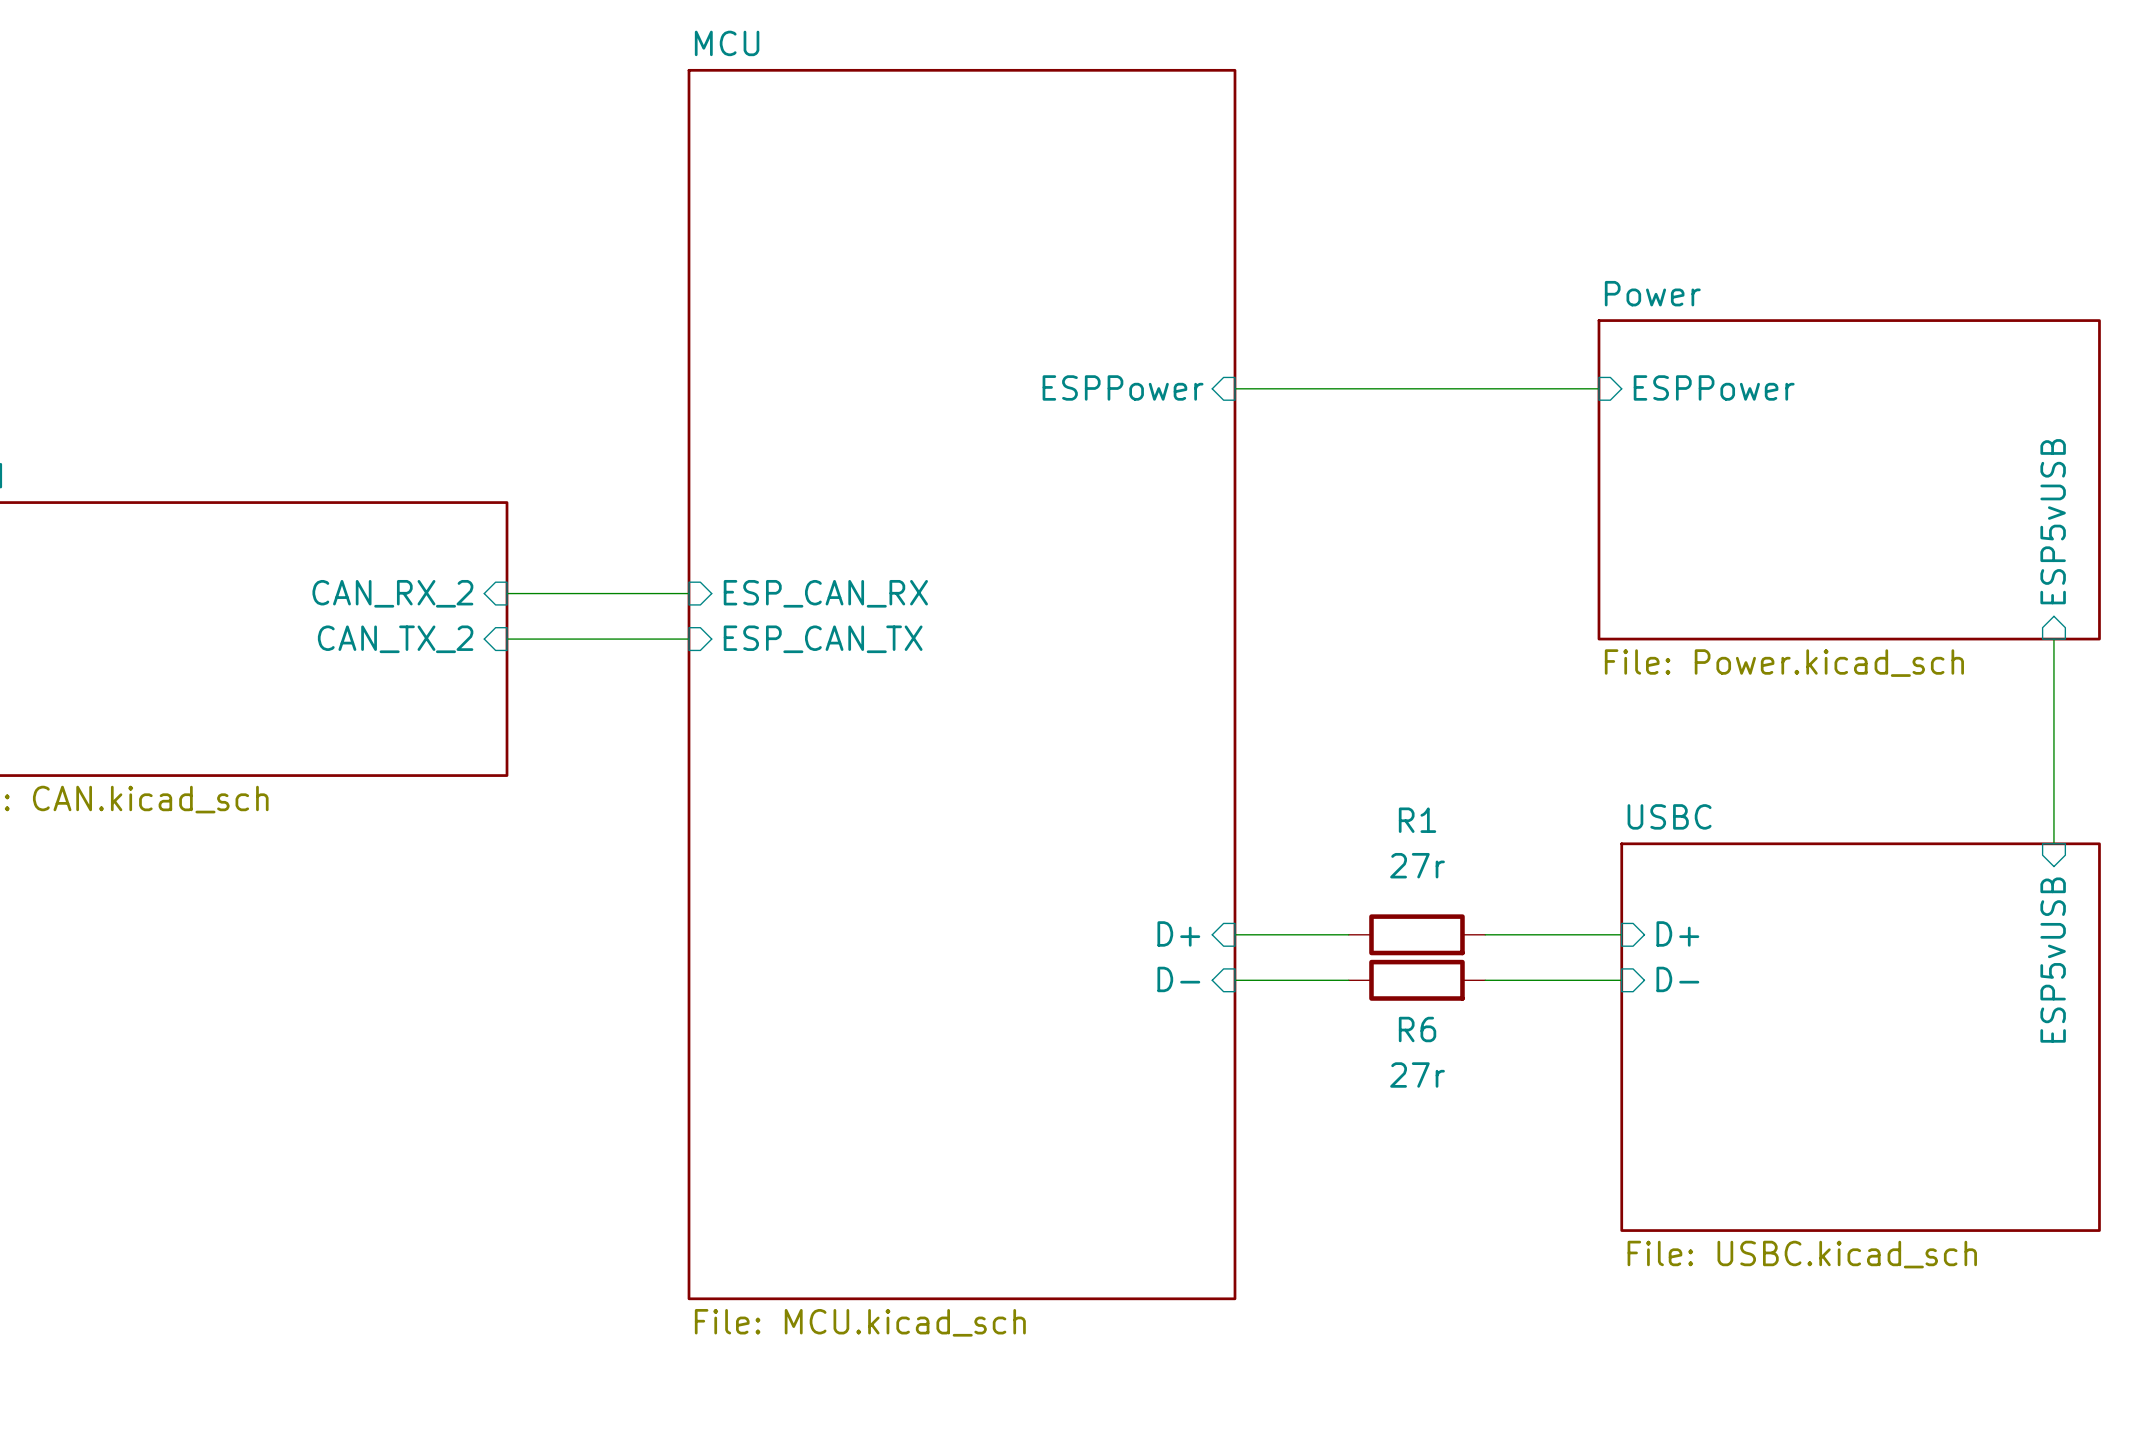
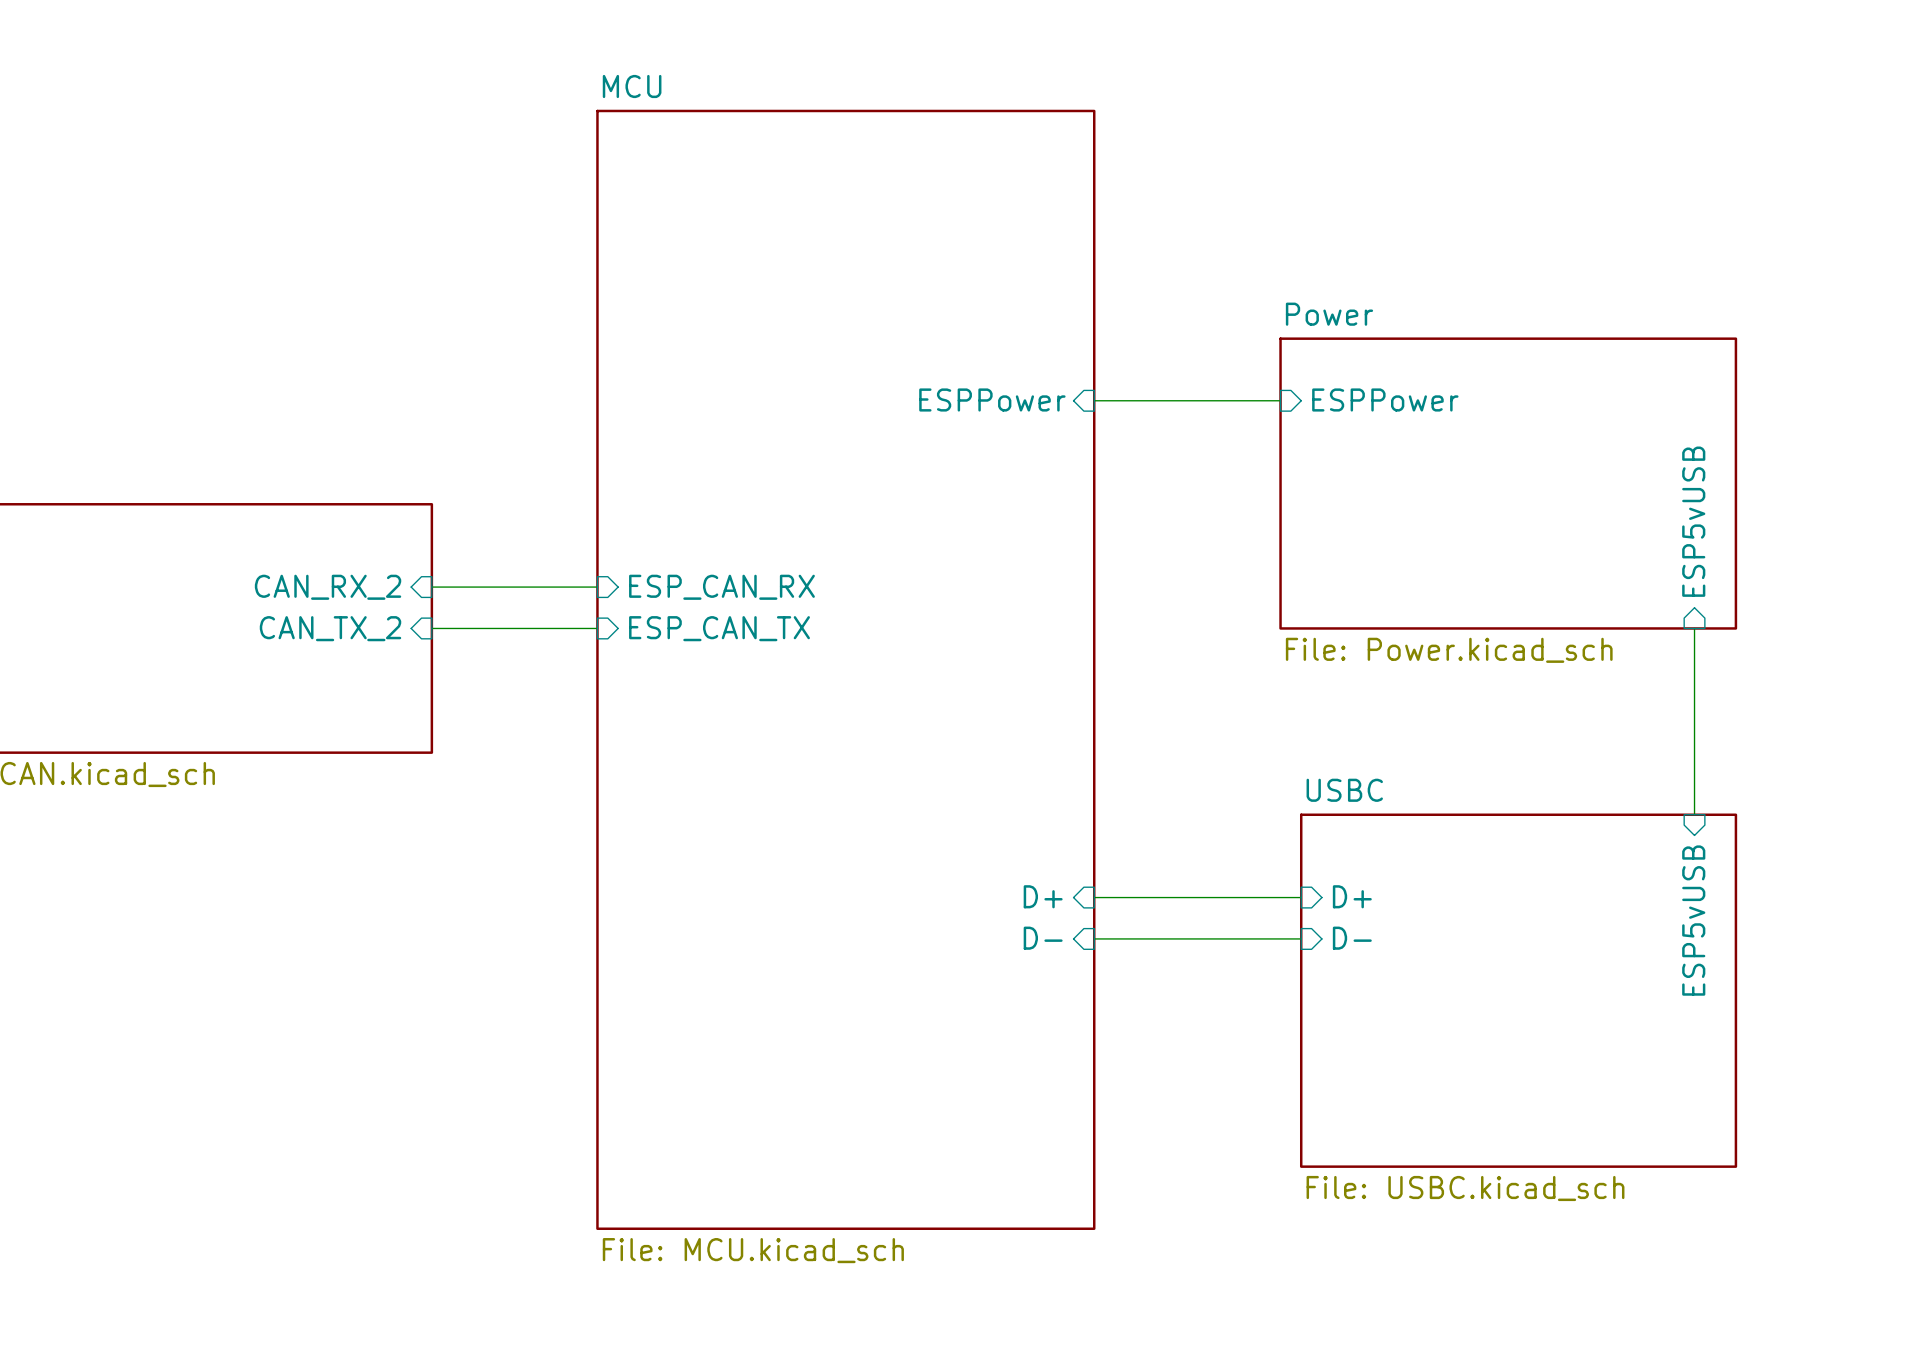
sheet pin position: ESPPower (1714, 387) -> ESPPower (1385, 399)
wire: (1439, 388) (1598, 388) -> none
sheet Power position: (1849, 479) -> (1508, 483)
sheet pin: none -> ESP5vUSB (1693, 521)
sheet pin: ESP5vUSB (2053, 521) -> none
wire: (2053, 639) (2053, 843) -> (1694, 628) (1694, 814)
sheet pin position: D+ (1677, 933) -> D+ (1352, 896)
wire: none -> (1197, 897) (1301, 897)
R1: 27r (1416, 934) -> none
wire: (1485, 934) (1621, 934) -> none
sheet pin: none -> ESP5vUSB (1693, 920)
sheet pin: ESP5vUSB (2053, 960) -> none
sheet pin position: D- (1677, 979) -> D- (1352, 938)
wire: none -> (1197, 938) (1301, 938)
R6: 27r (1416, 980) -> none
wire: (1485, 980) (1621, 980) -> none
sheet USBC position: (1860, 1037) -> (1518, 990)

